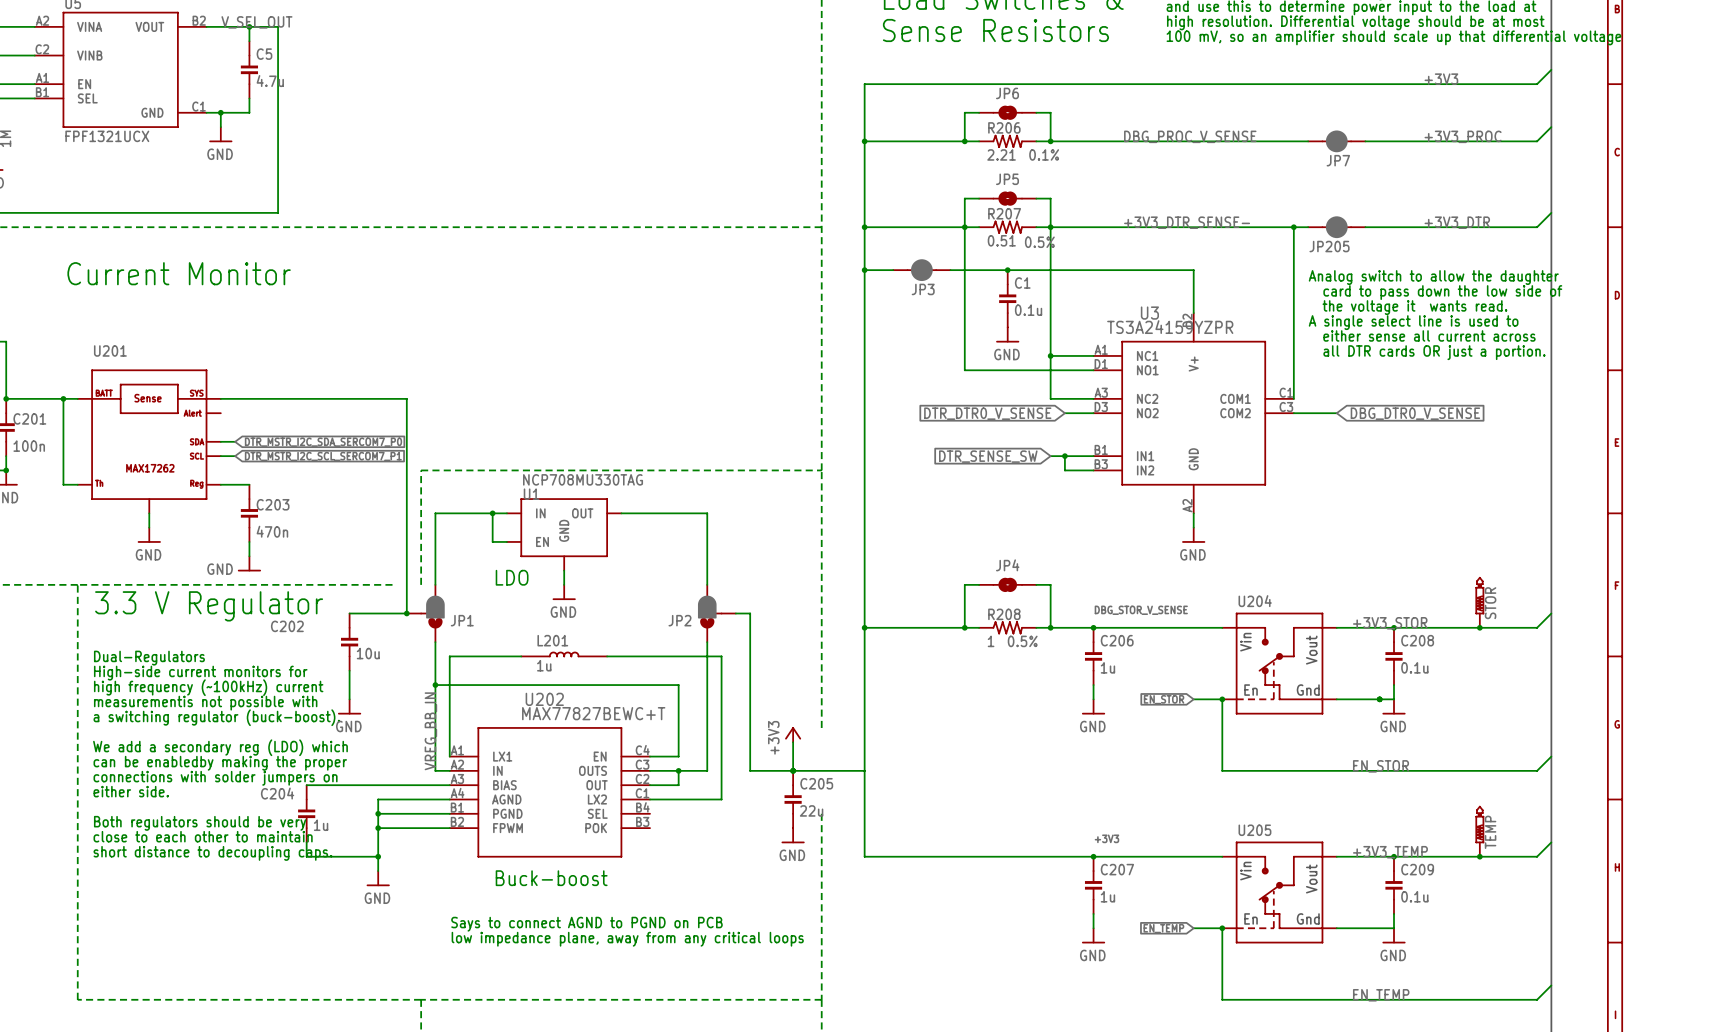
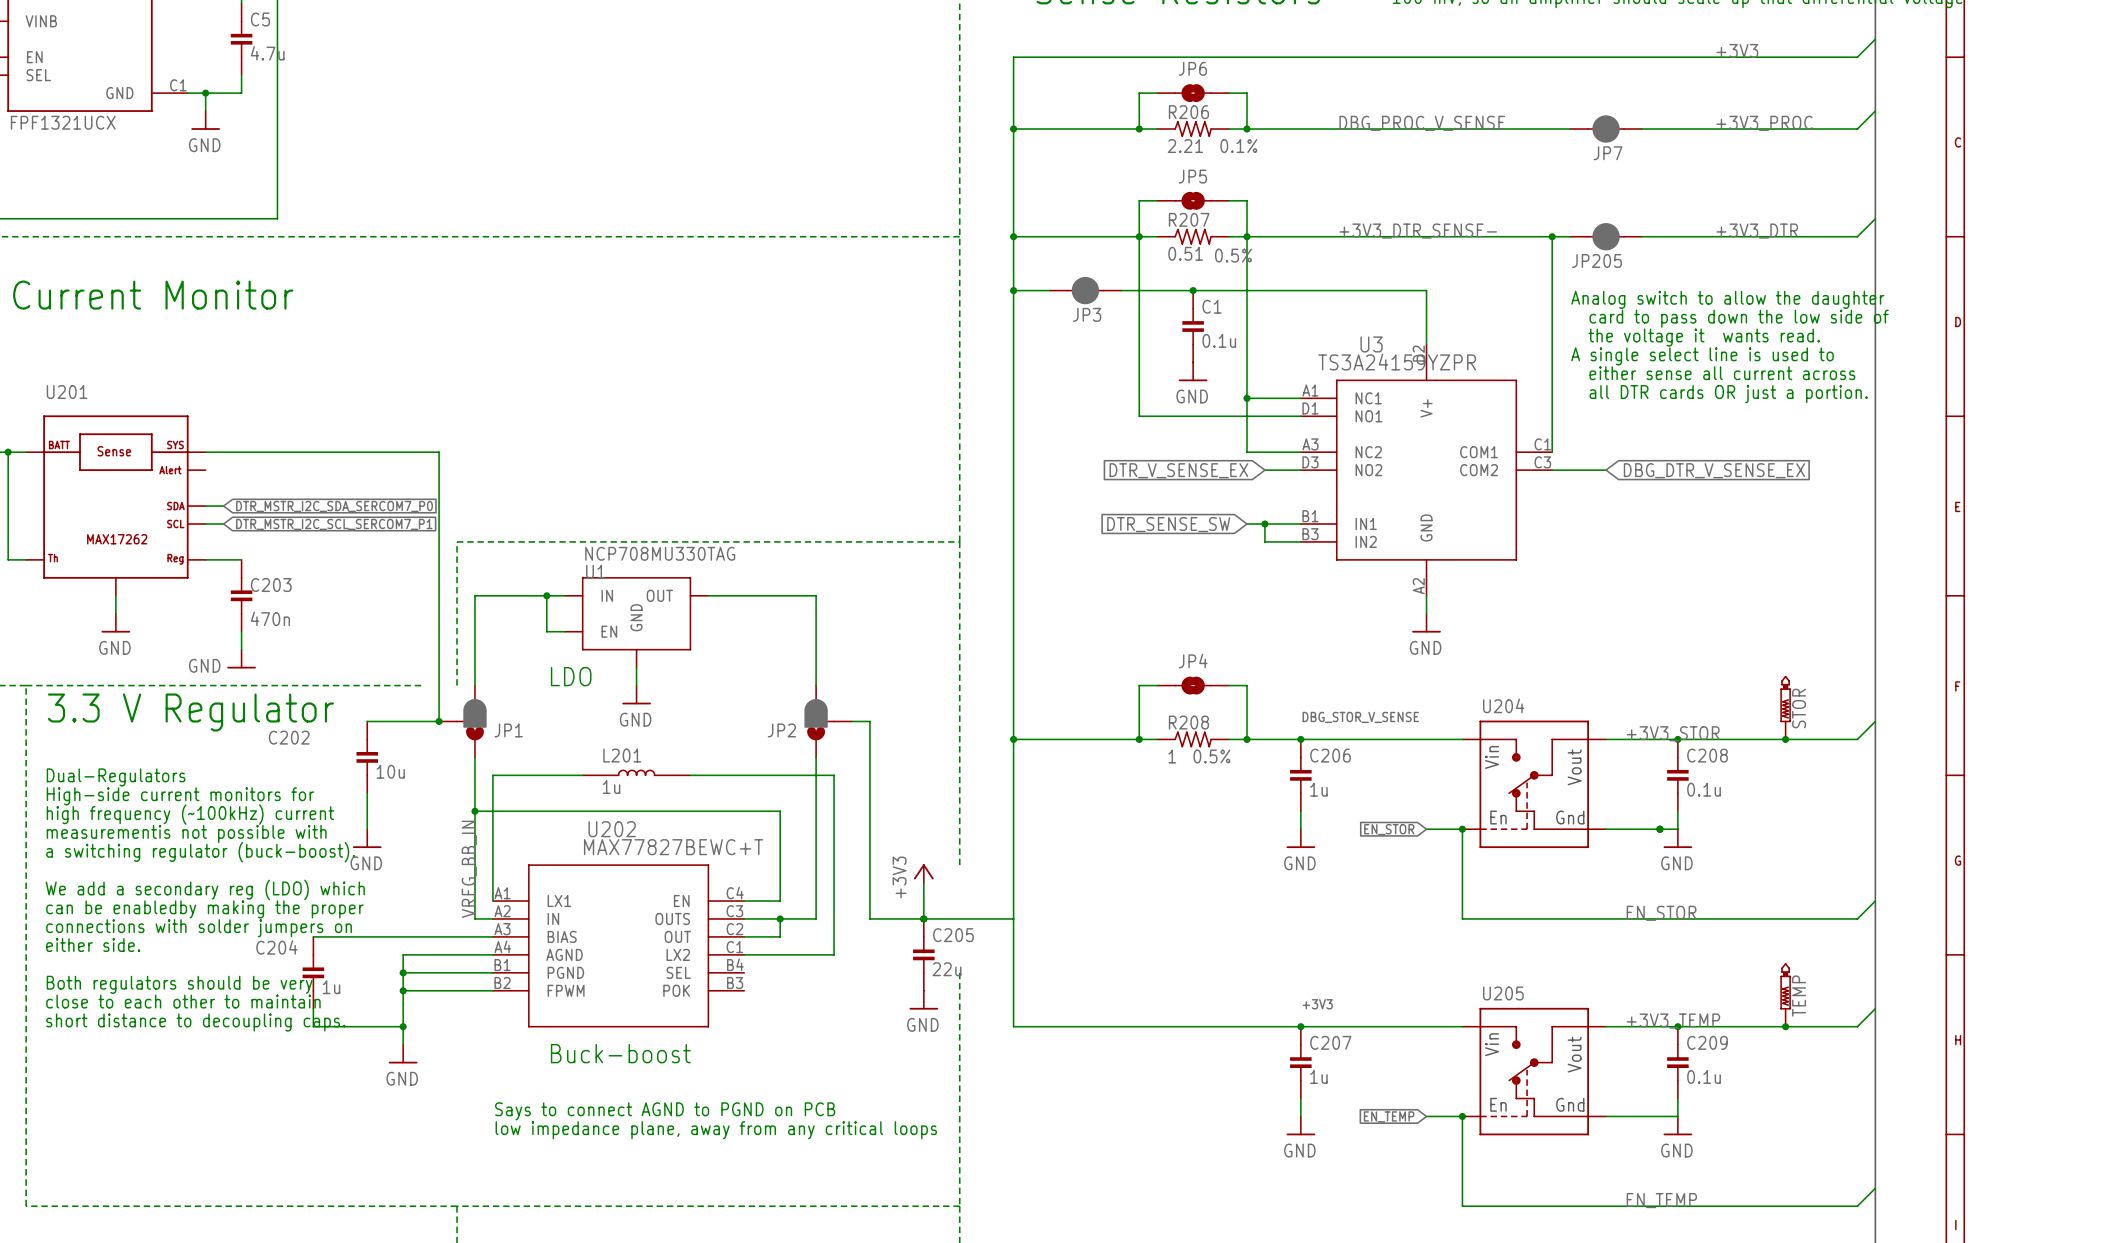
global label: DTR_DTR0_V_SENSE (987, 413) -> DTR_V_SENSE_EX (1178, 470)
global label: DBG_DTR0_V_SENSE (1415, 413) -> DBG_DTR_V_SENSE_EX (1714, 470)

